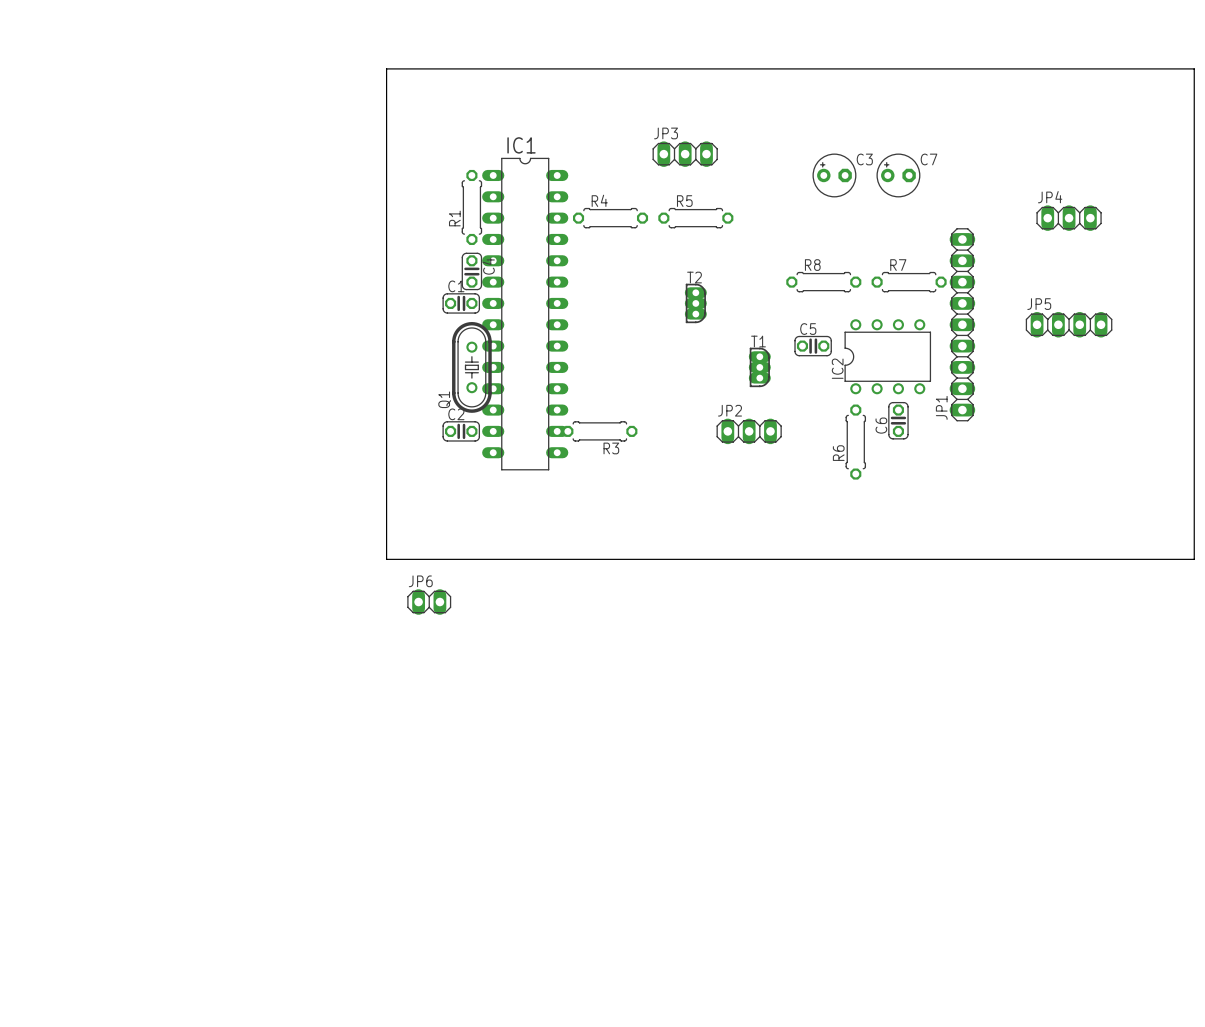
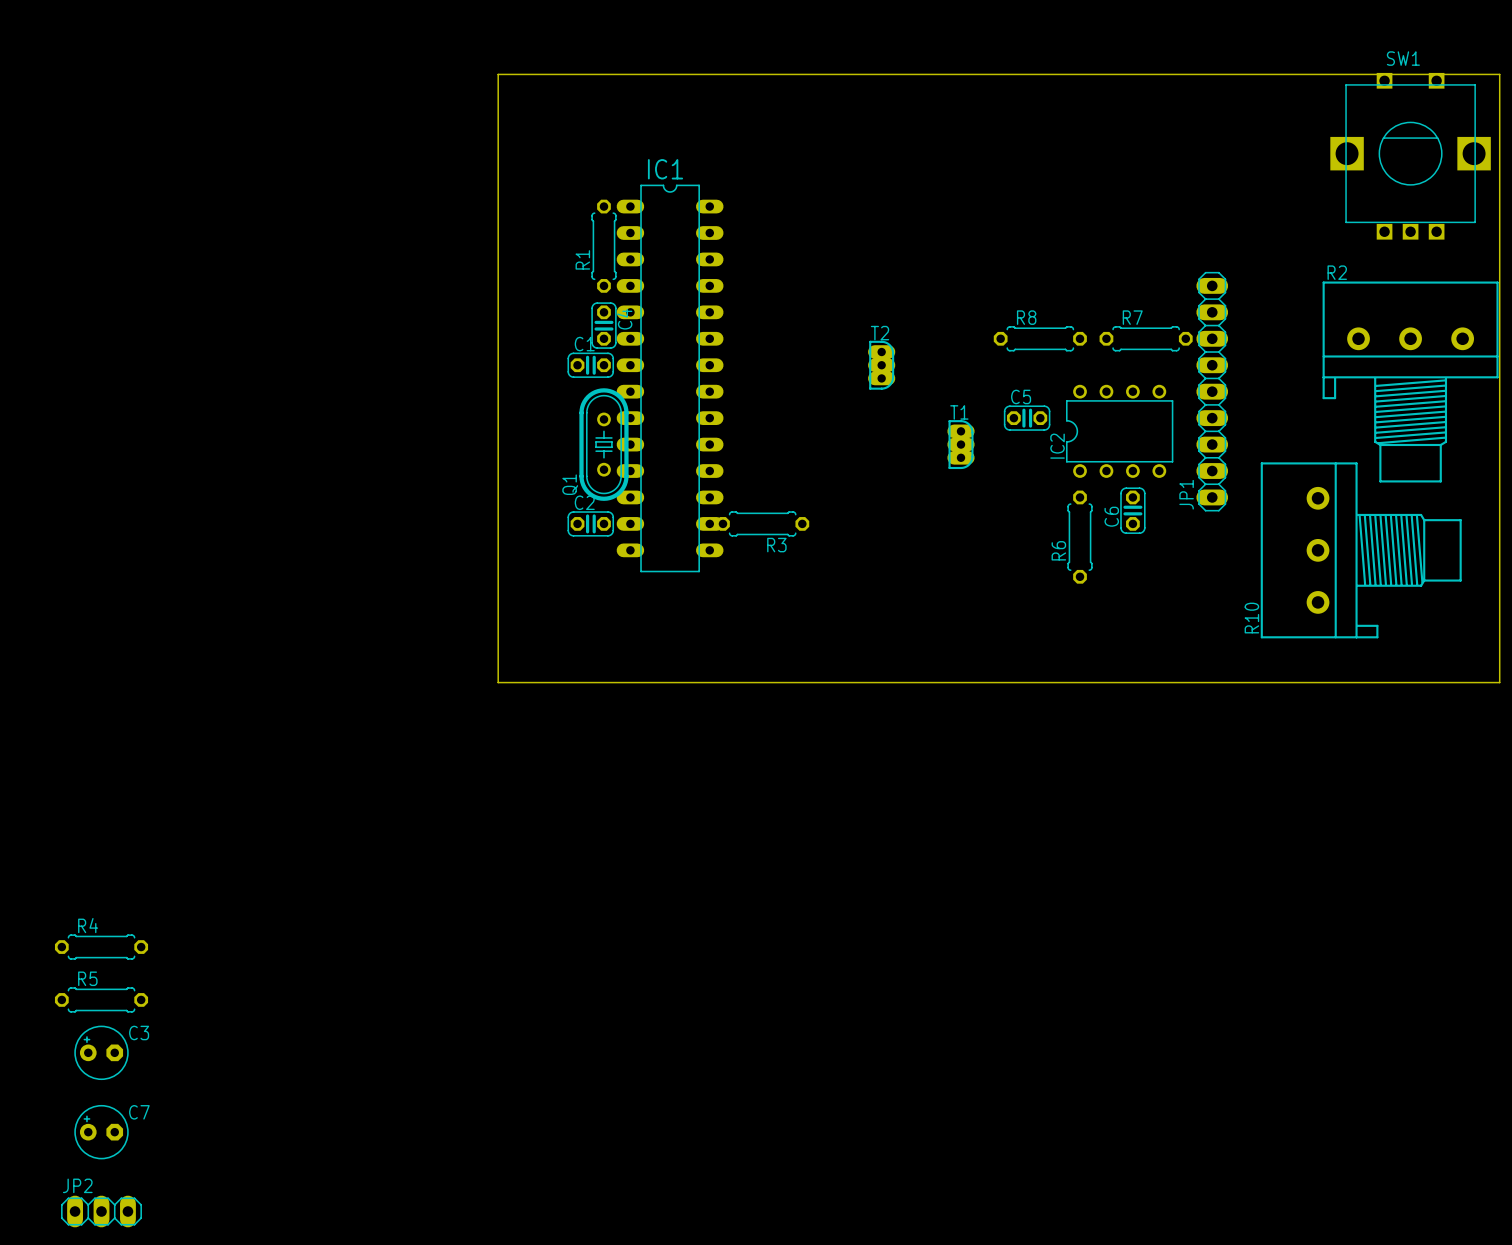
SW1: none -> (1410, 156)
JP3: (685, 154) -> none
C3 position: (834, 175) -> (101, 1052)
C7 position: (898, 175) -> (101, 1132)
R4 position: (610, 218) -> (101, 947)
R5 position: (695, 218) -> (101, 999)
JP4: (1069, 218) -> none
R2: none -> (1410, 381)
JP5: (1069, 324) -> none
JP2 position: (749, 431) -> (101, 1211)
R10: none -> (1361, 550)
JP6: (429, 602) -> none

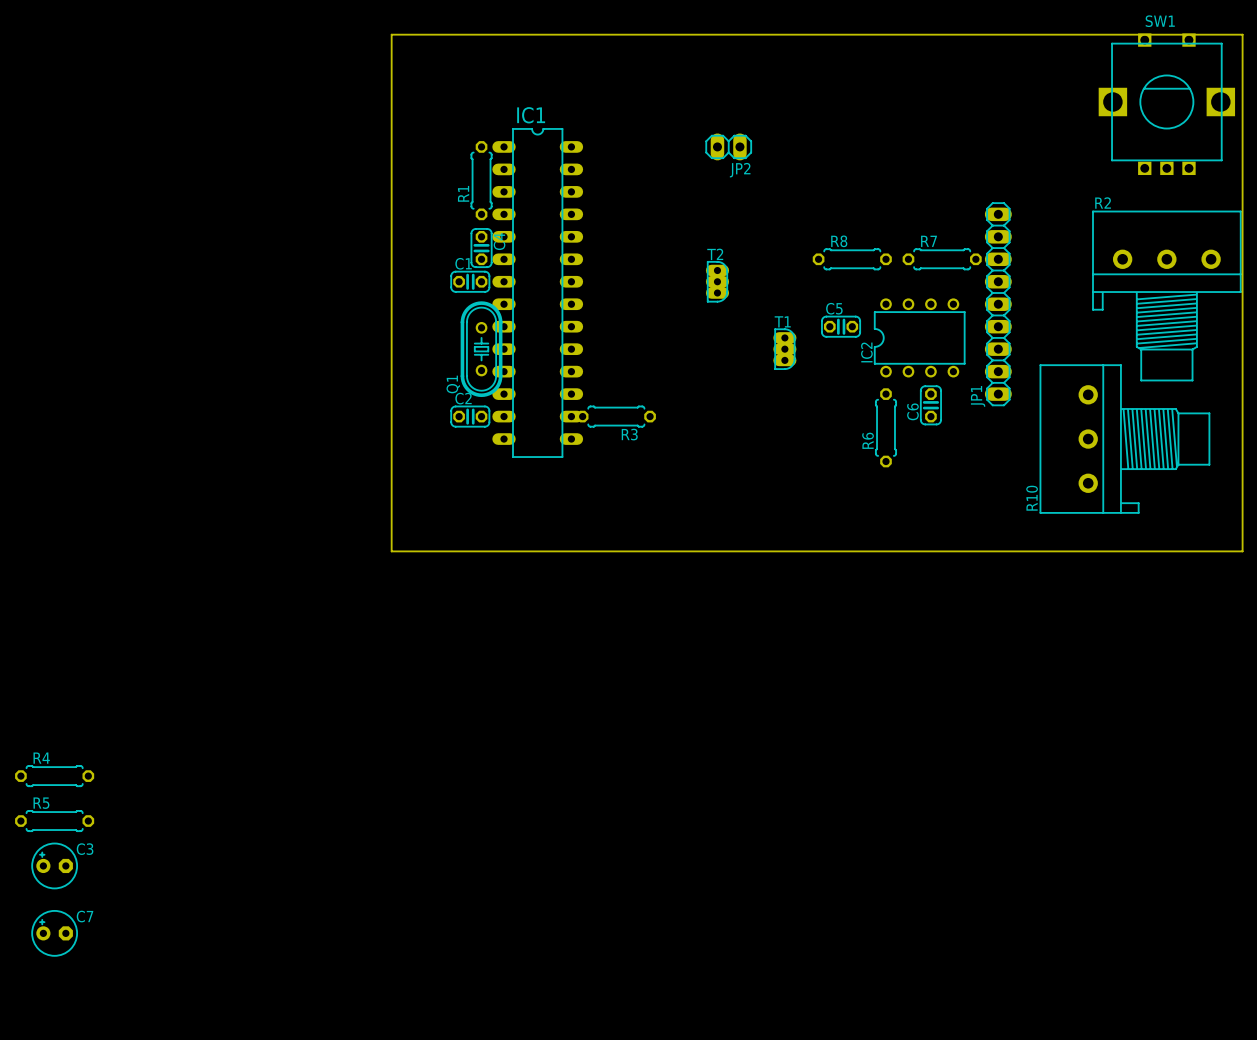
JP2 name position: JP2 (77, 1185) -> JP2 (740, 170)
JP2 footprint: [61, 1195, 142, 1228] -> [705, 133, 752, 161]

